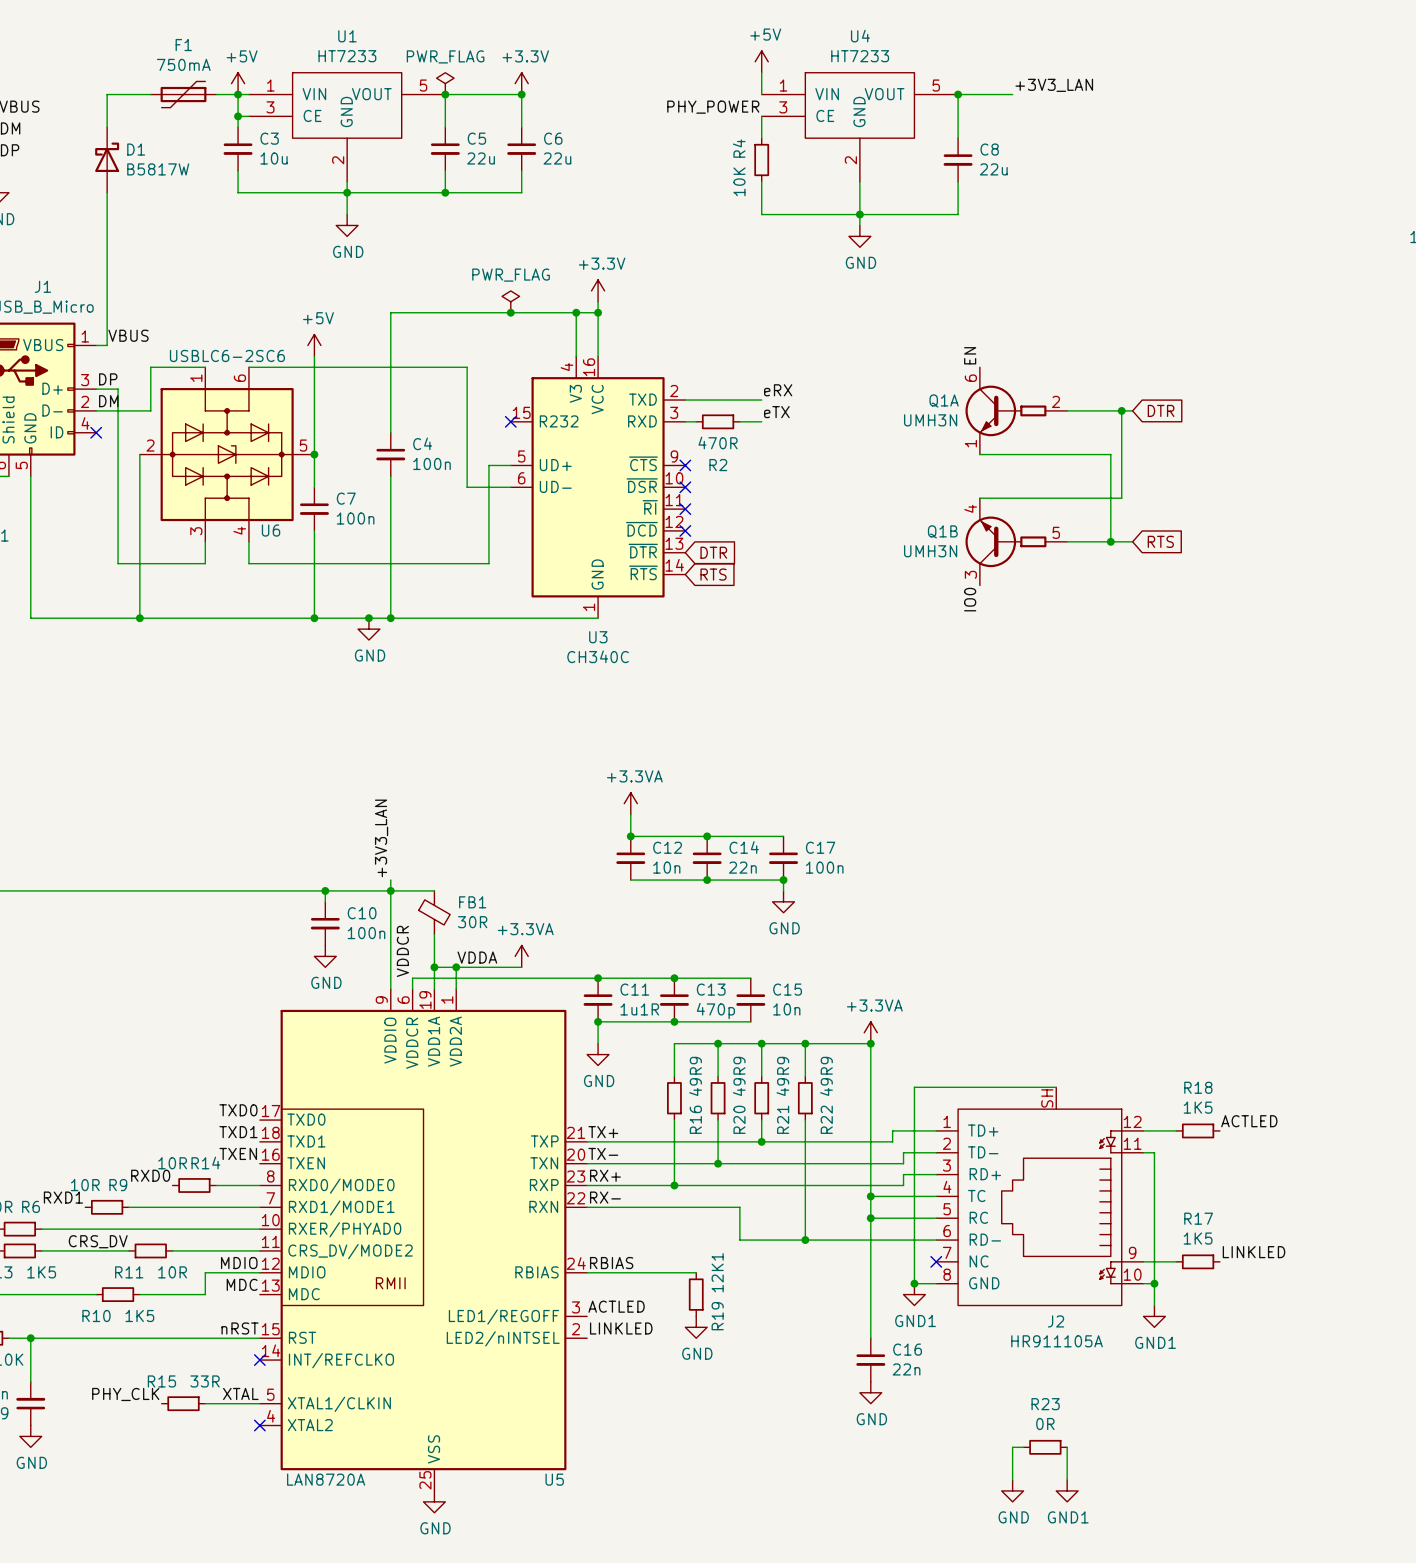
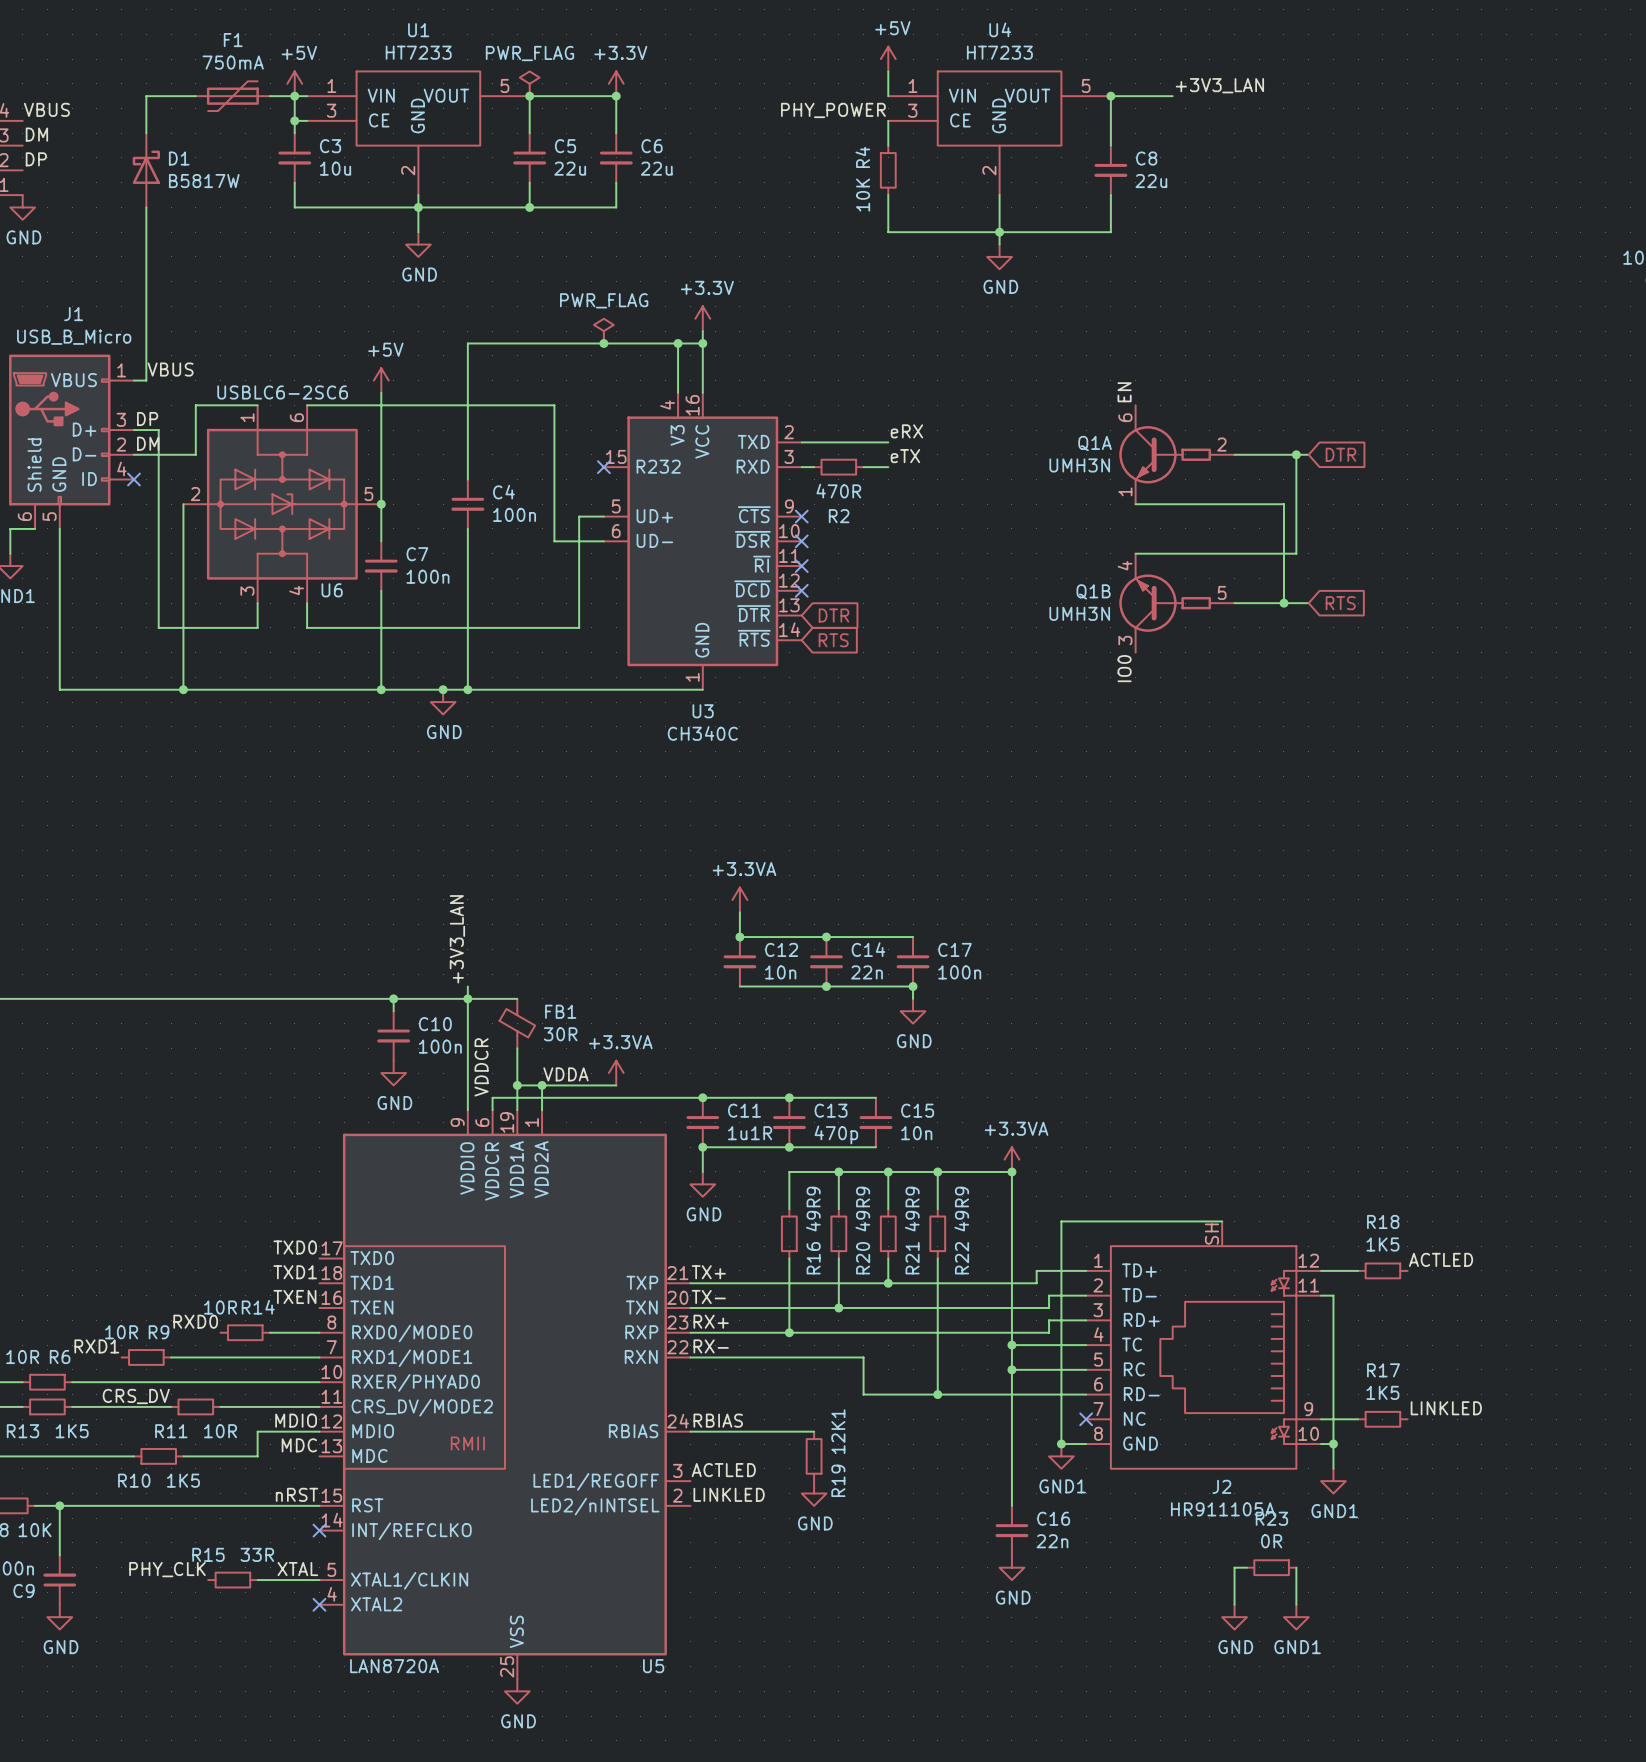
wire: (1023, 1447) (1012, 1447) (1012, 1480) -> (1246, 1567) (1234, 1567) (1234, 1604)
R23 position: (1045, 1447) -> (1271, 1567)
wire: (1067, 1447) (1067, 1480) -> (1296, 1567) (1296, 1604)
power symbol position: GND (1012, 1490) -> GND (1234, 1617)
power symbol position: GND1 (1067, 1490) -> GND1 (1296, 1617)

